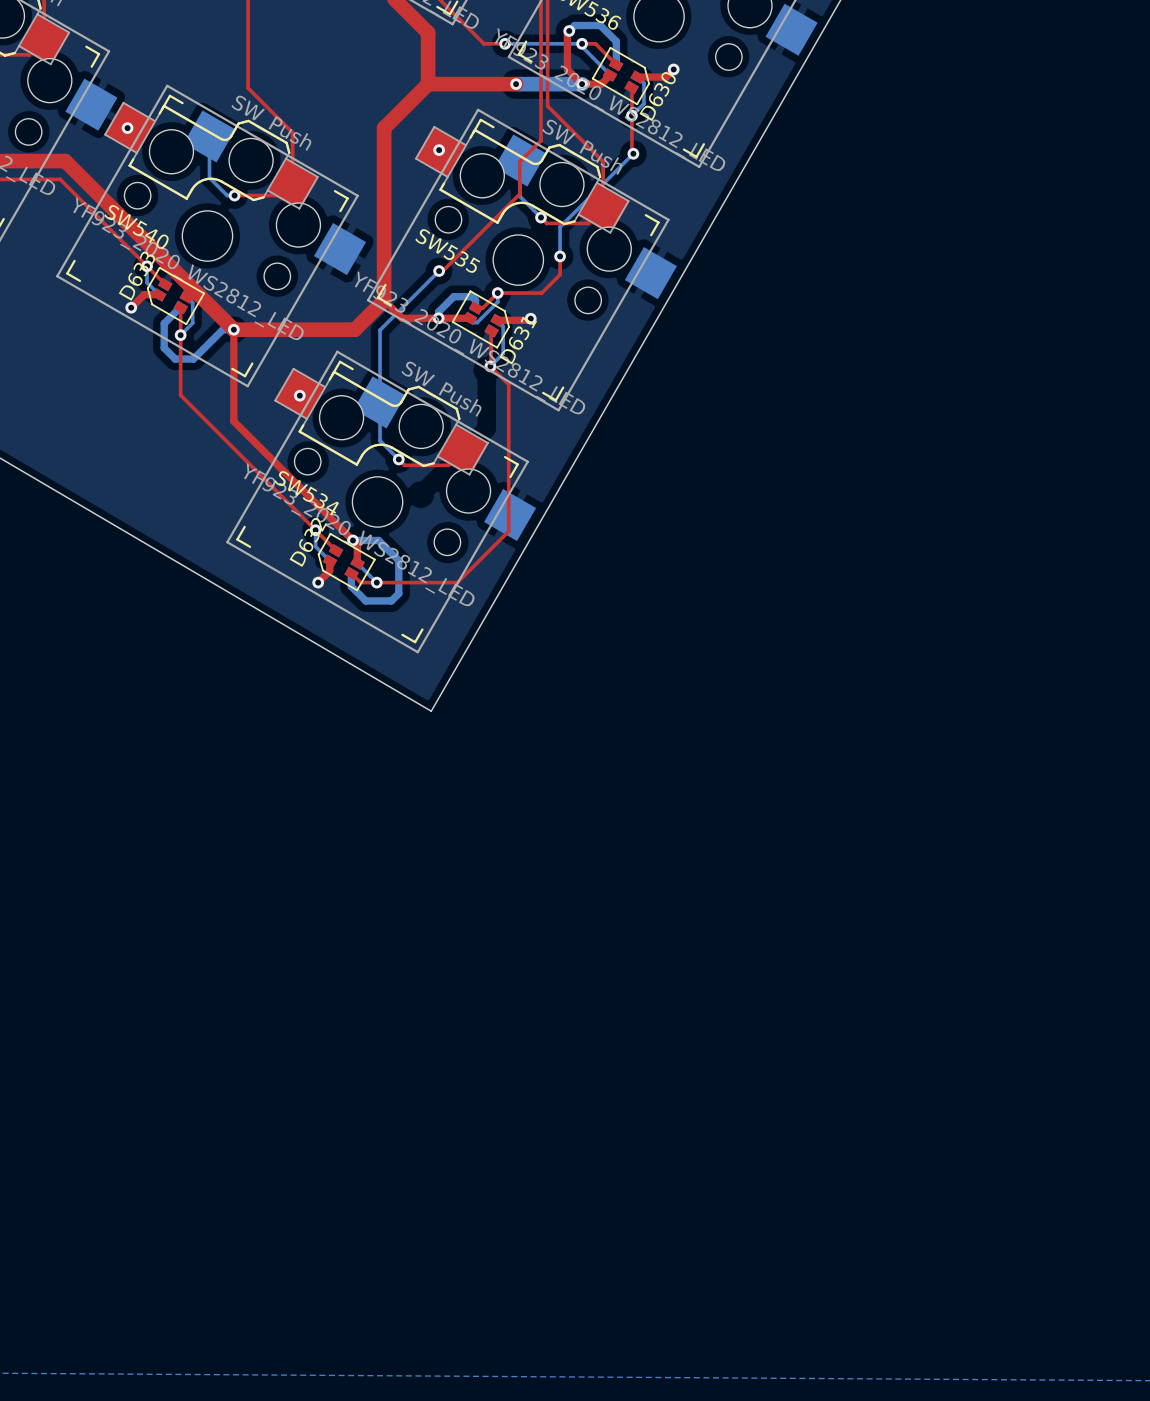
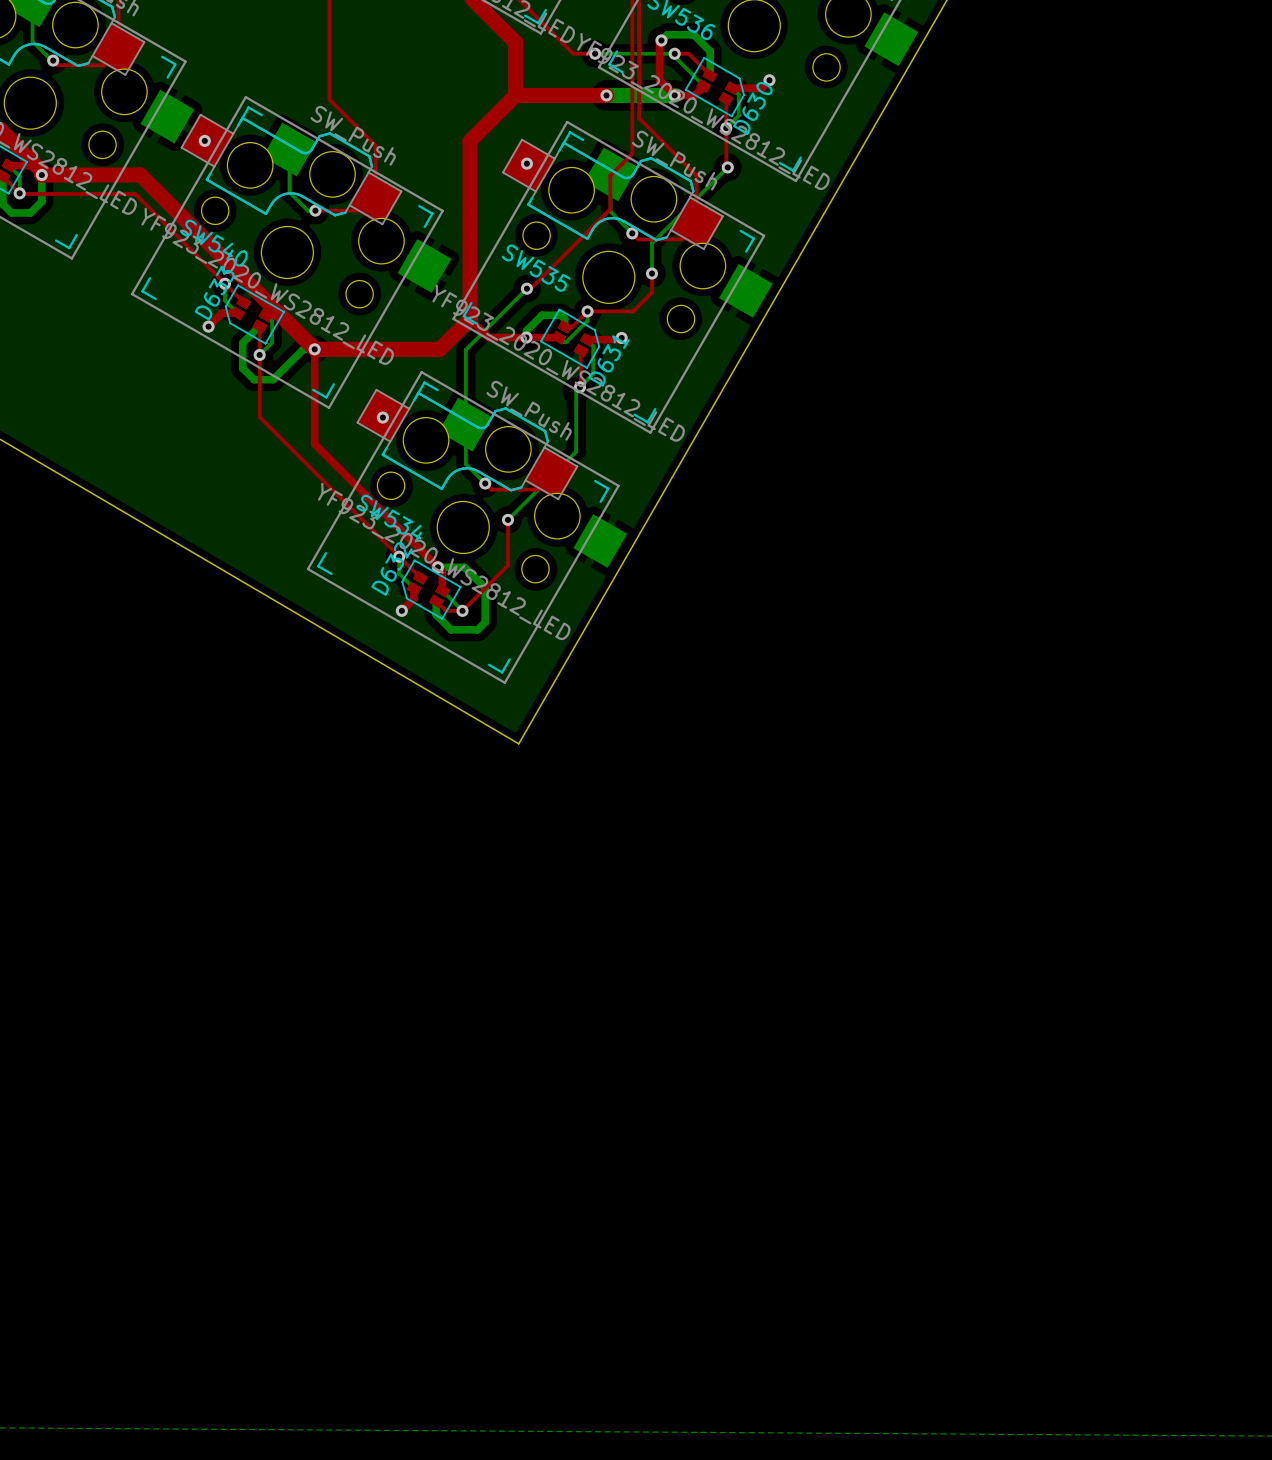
top track: (490, 366) (508, 384) (508, 531) (457, 582) (376, 582) -> (507, 519) (507, 565) (462, 610)
bottom track: none -> (579, 387) (576, 391) (576, 451) (507, 519)
via: none -> (507, 519)

